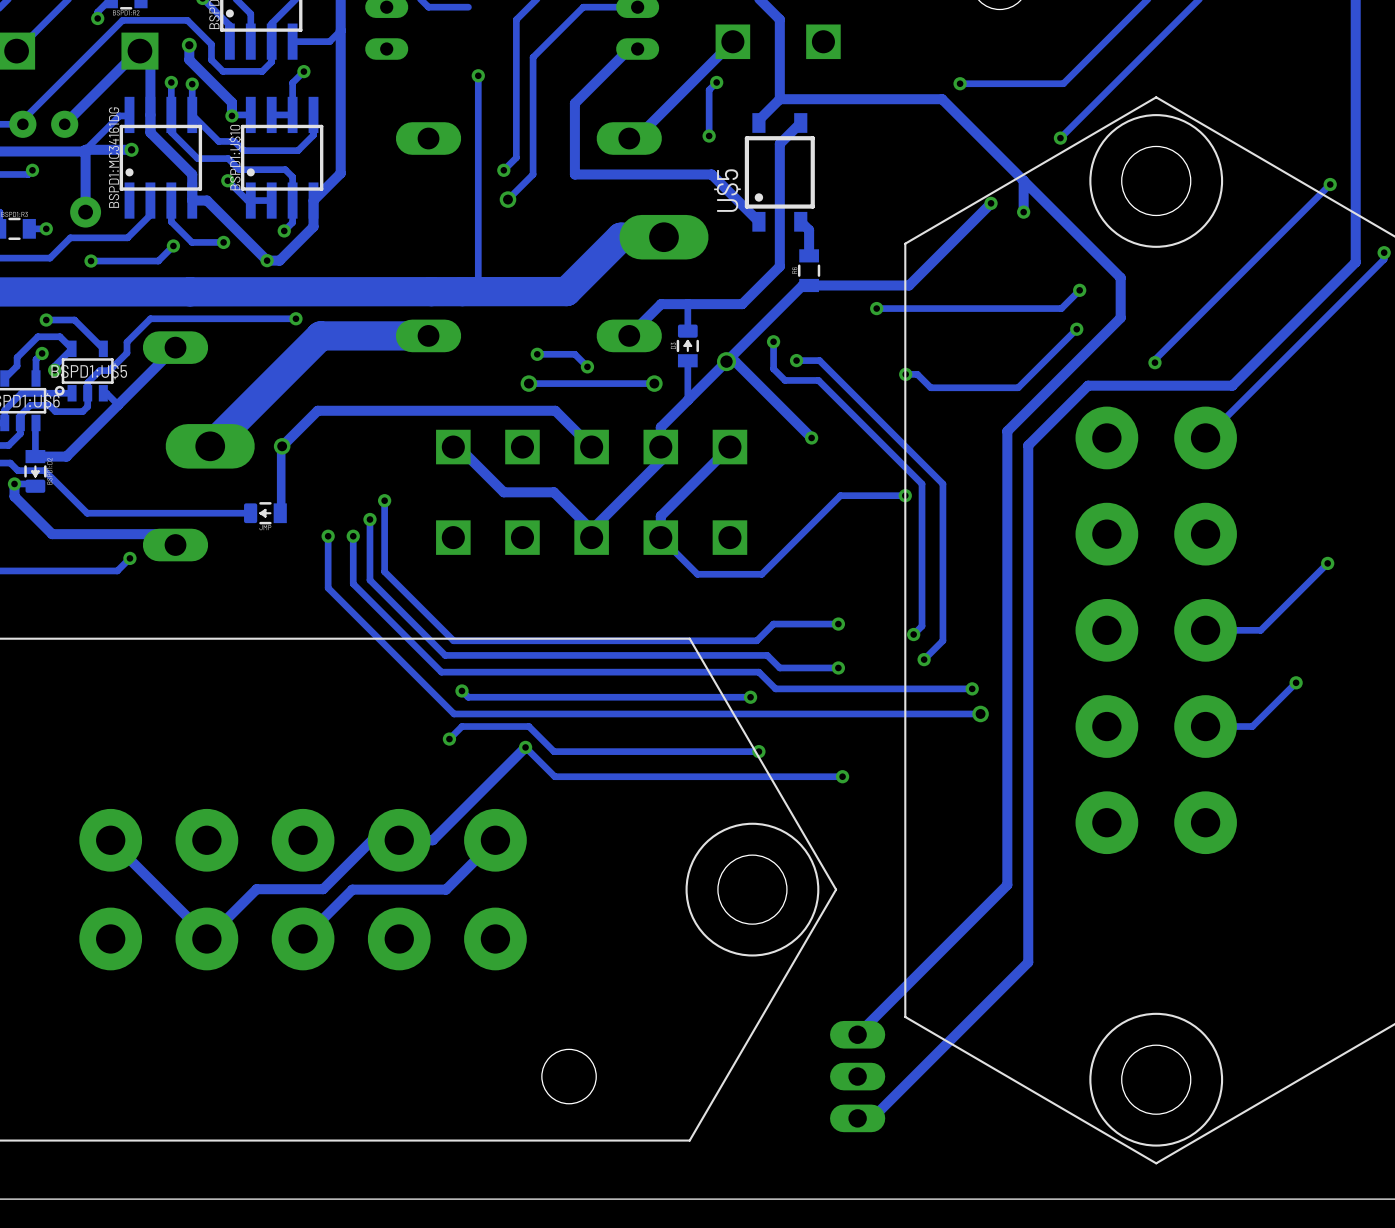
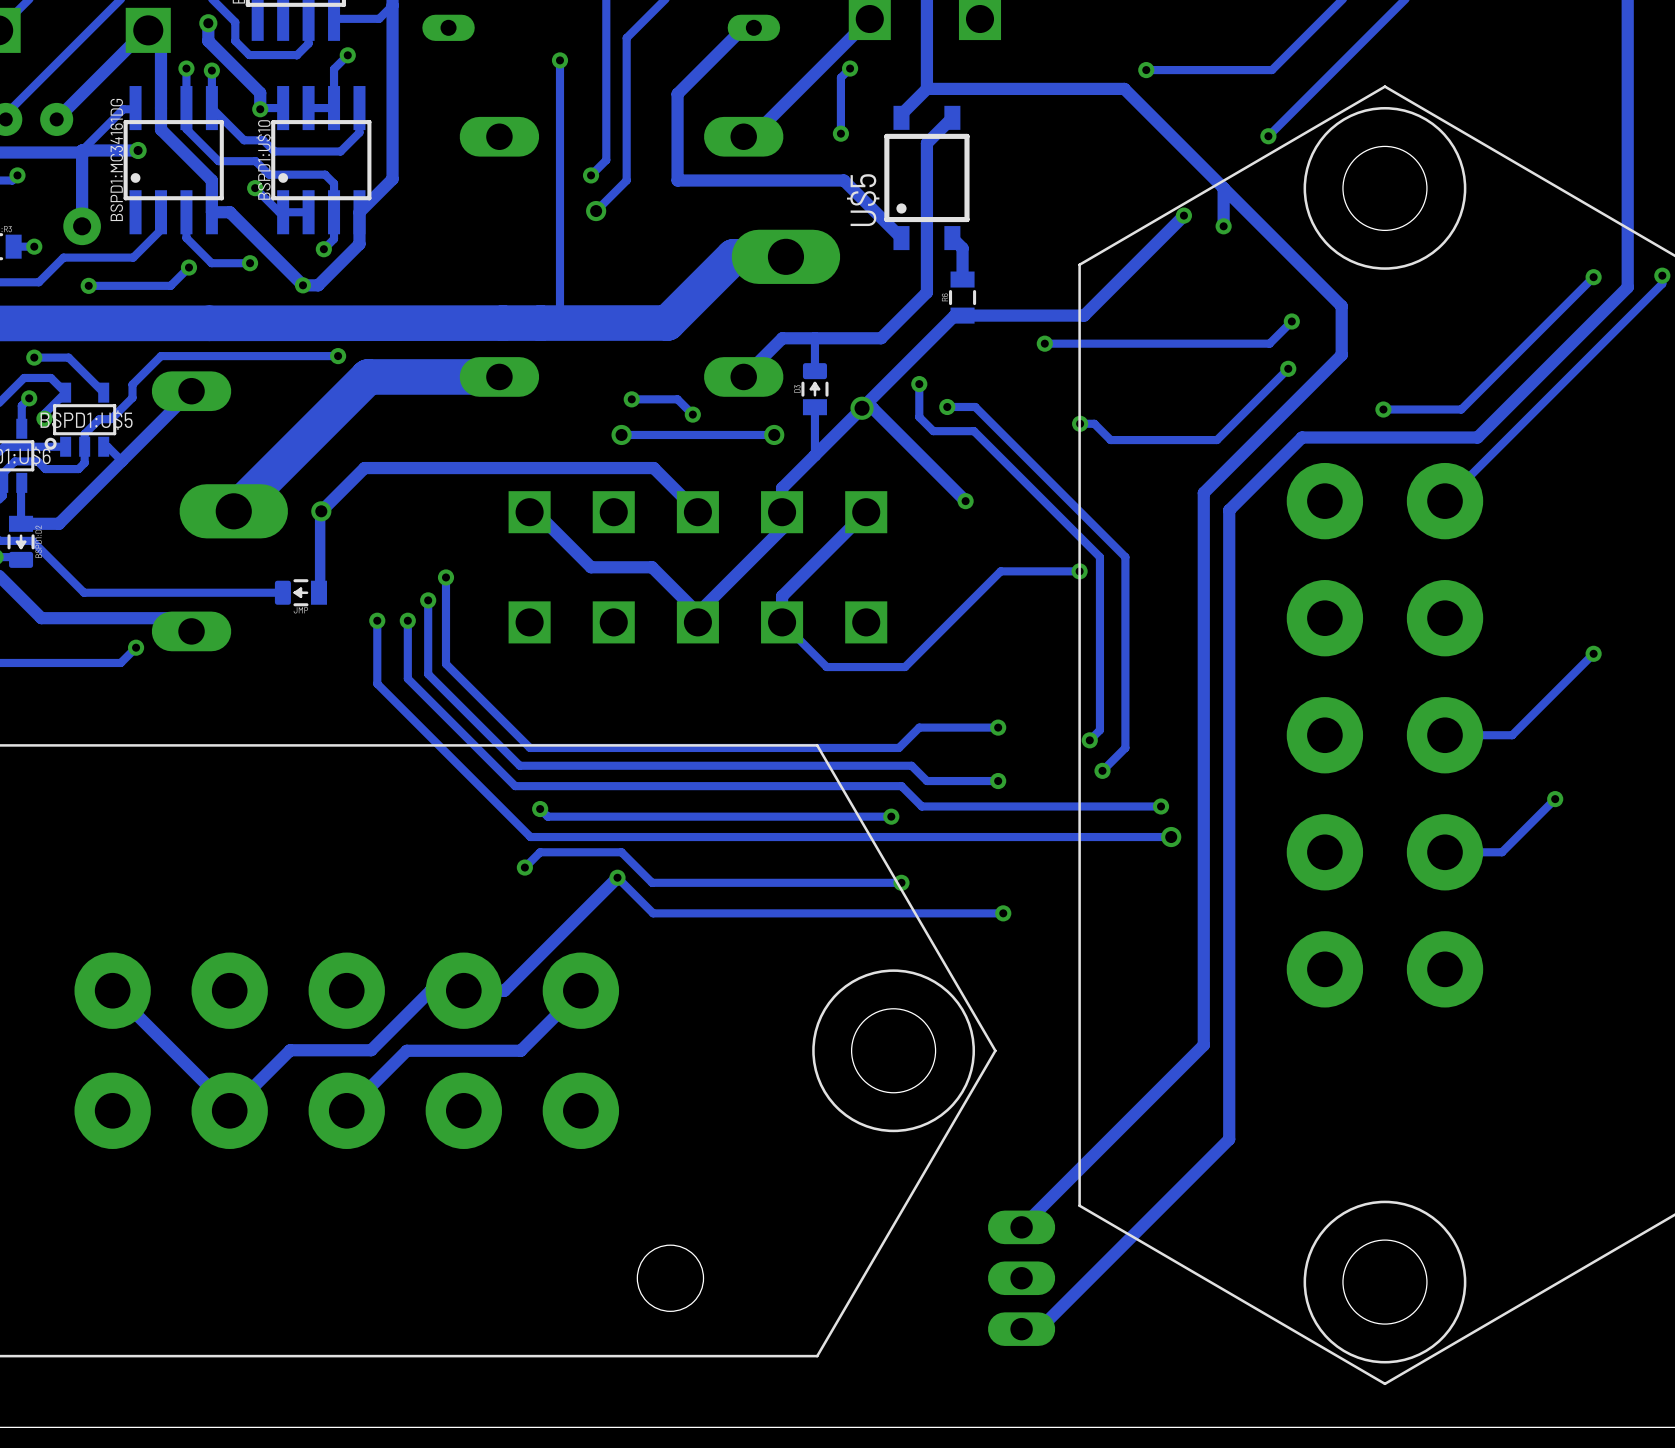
track: (1330, 184) (1154, 359) (1154, 362) -> (1593, 277) (1461, 409) (1383, 409)
via position: (1330, 184) -> (1593, 277)

